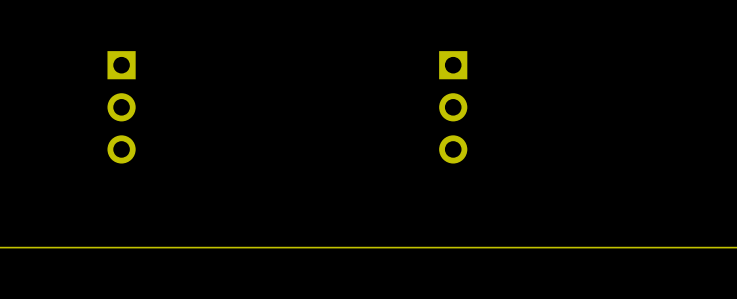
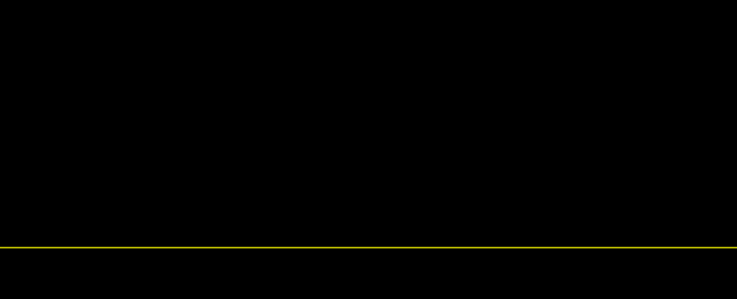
part: (121, 107) -> none
part: (453, 107) -> none

